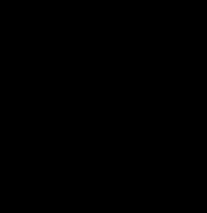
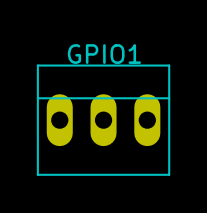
GPIO1: none -> (103, 120)

